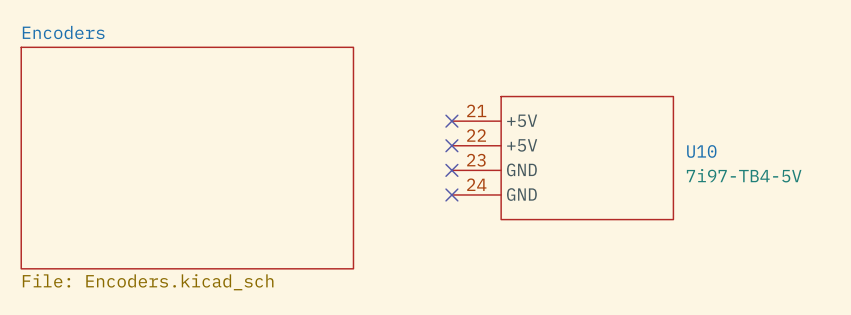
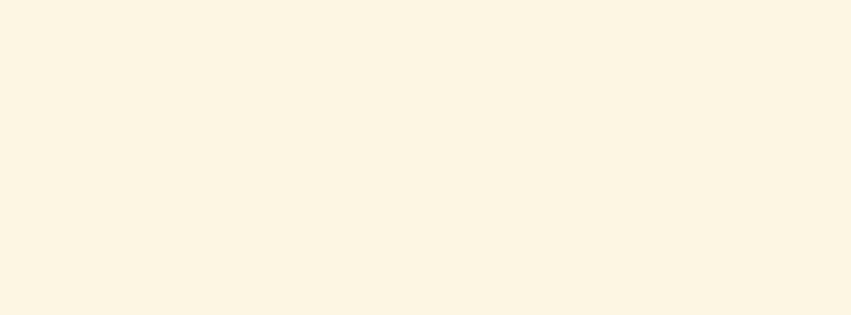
no-connect mark: (451, 121) -> none
no-connect mark: (451, 145) -> none
sheet Encoders: File: Encoders.kicad_sch (187, 158) -> none
U10: 7i97-TB4-5V (563, 158) -> none
no-connect mark: (451, 170) -> none
no-connect mark: (451, 194) -> none

